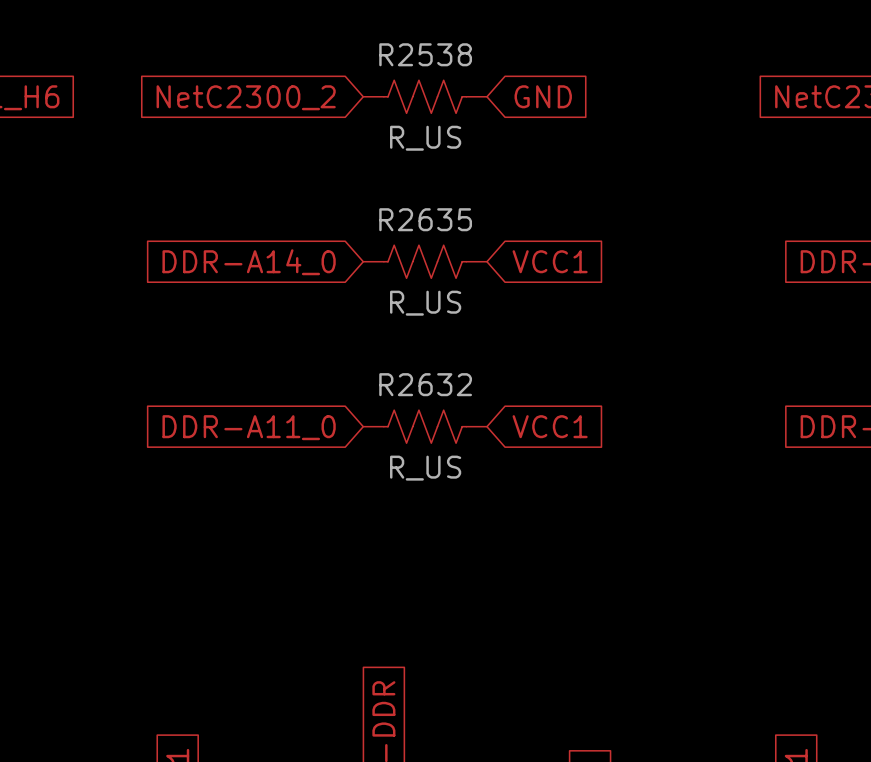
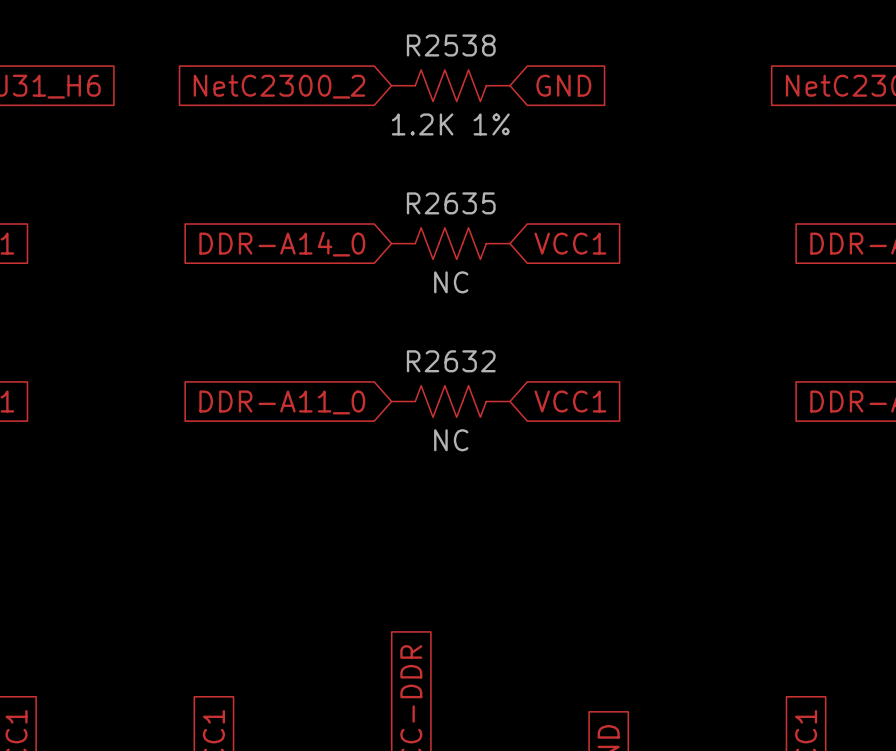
R2538 value: R_US (425, 138) -> 1.2K 1% (450, 124)
R2635 value: R_US (425, 303) -> NC (451, 282)
R2632 value: R_US (425, 468) -> NC (451, 440)

